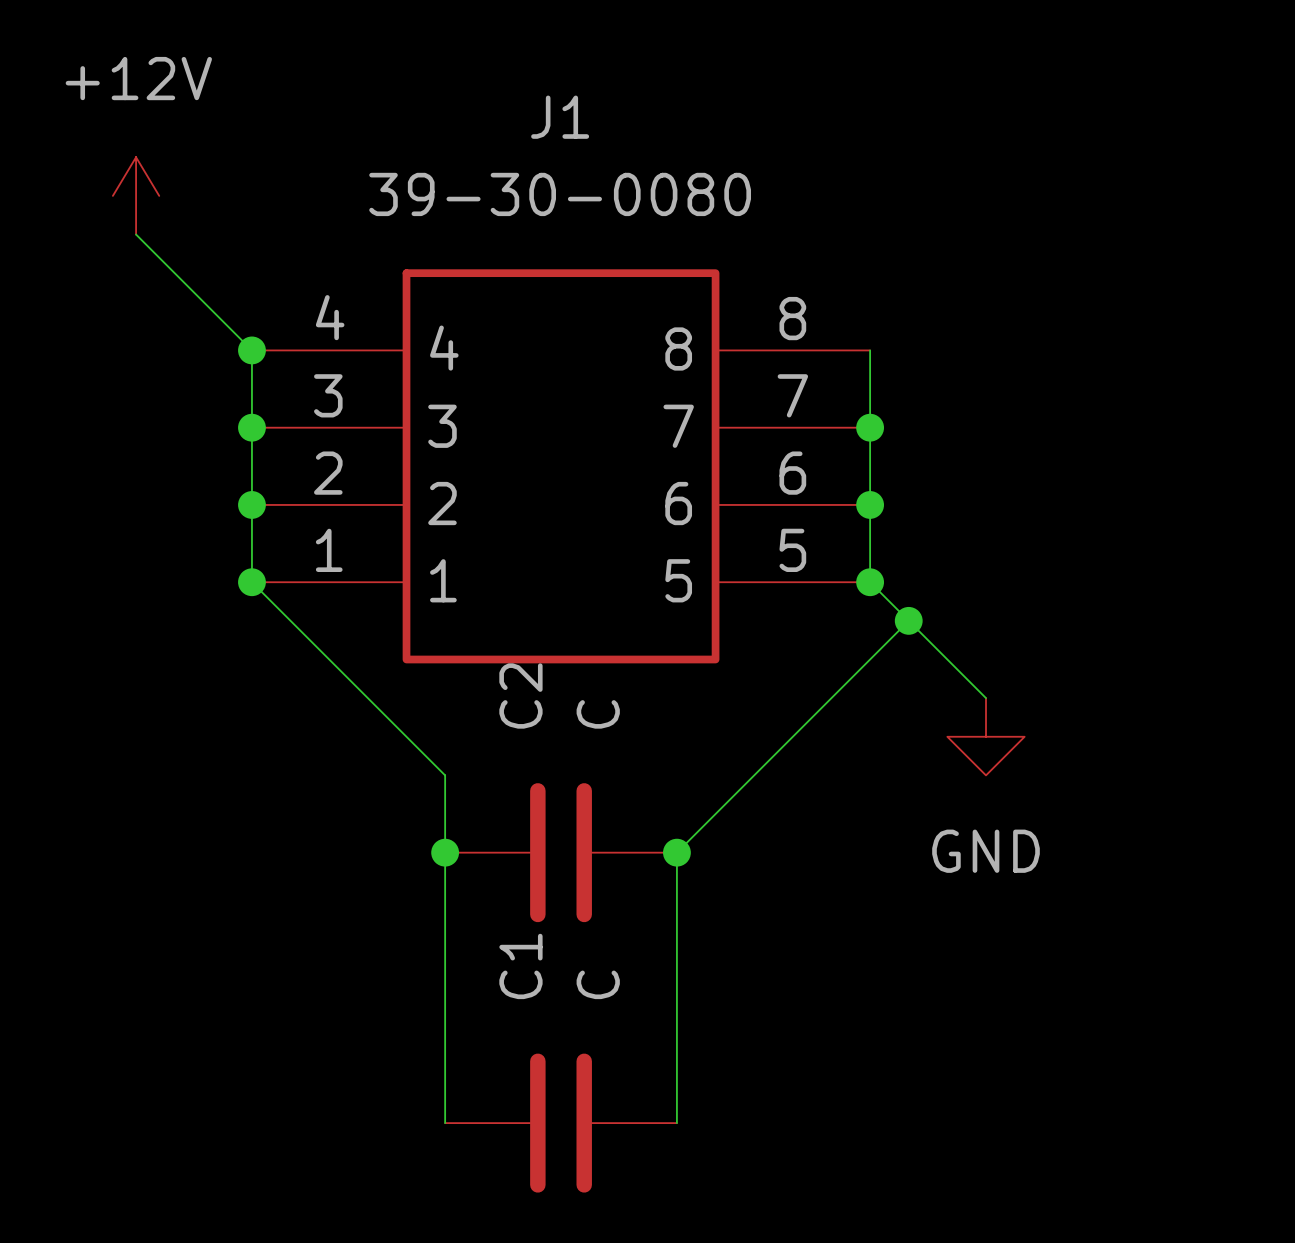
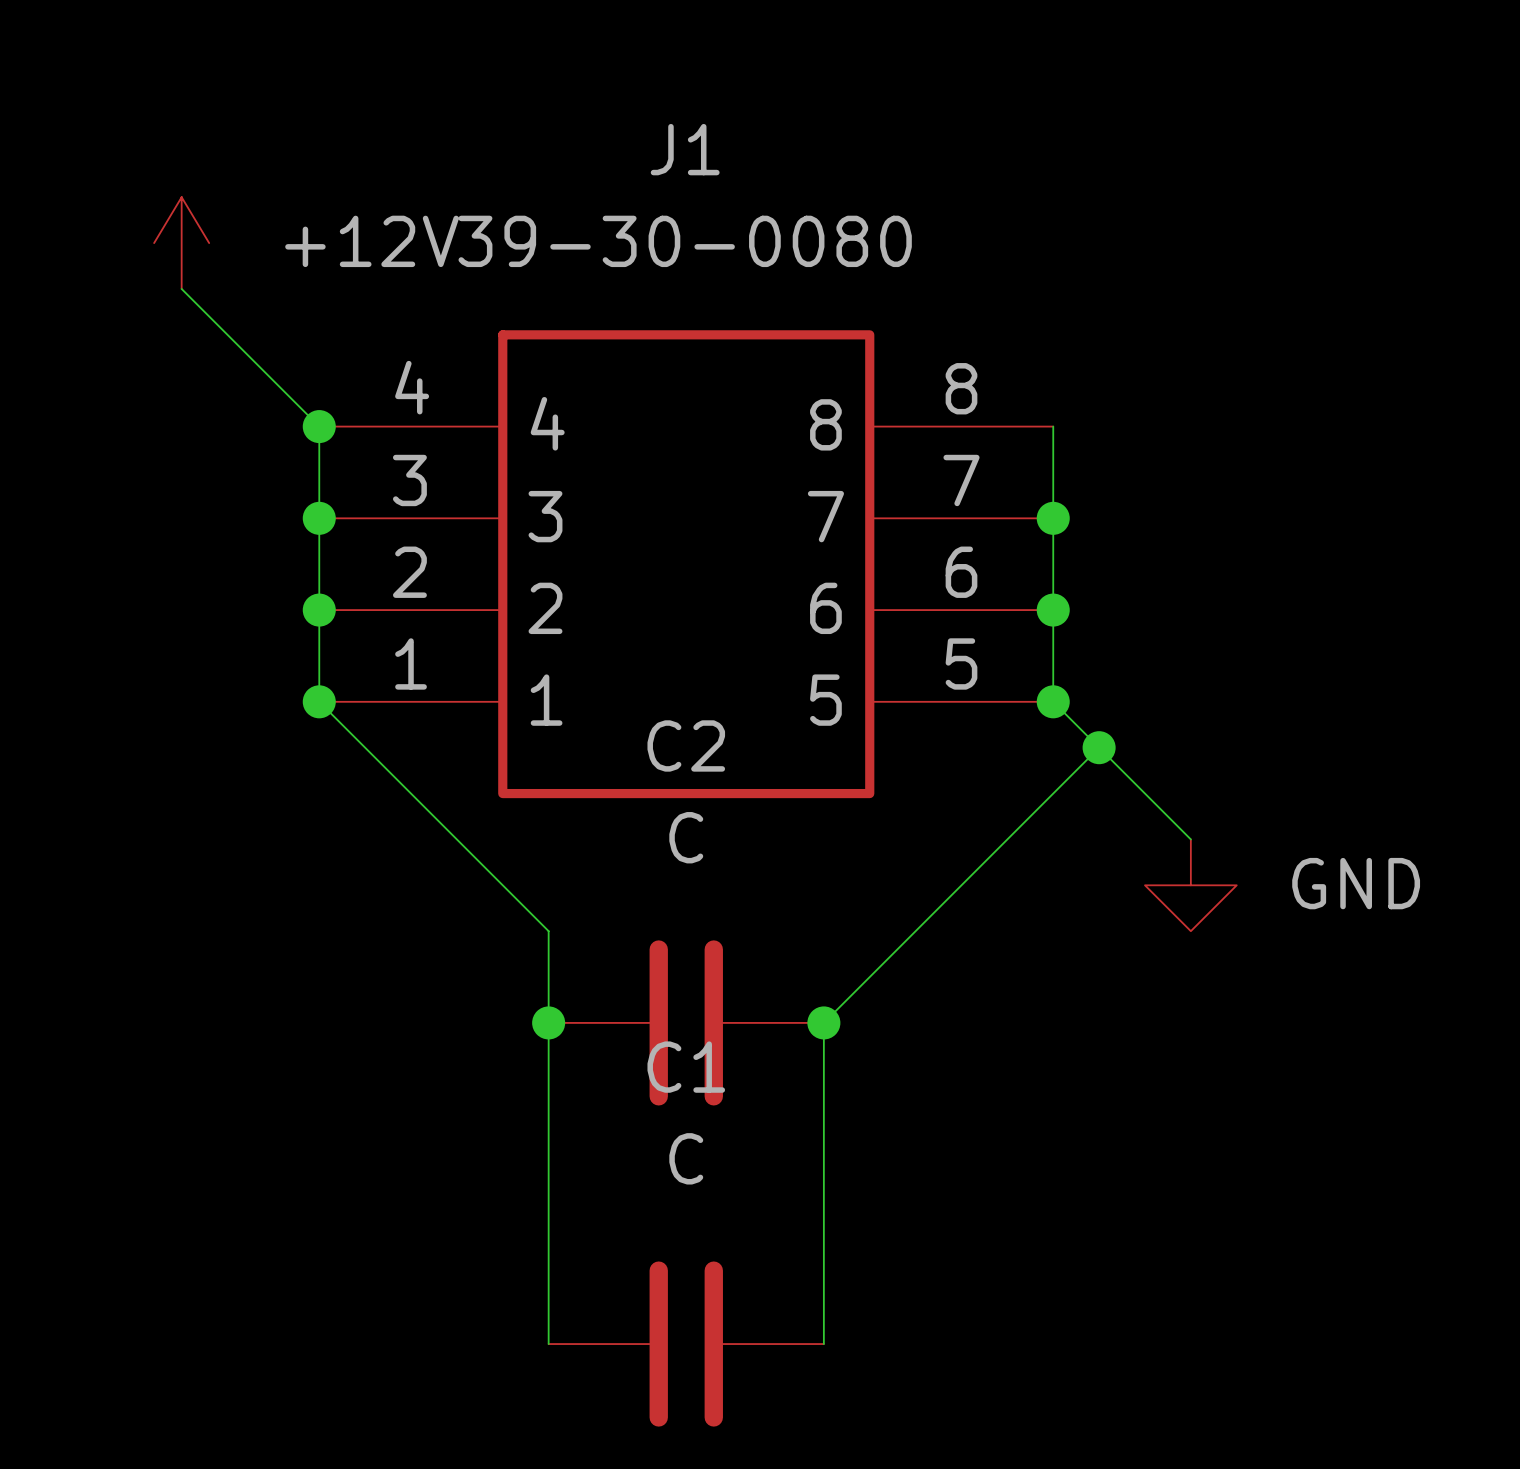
power symbol text position: +12V (138, 78) -> +12V (372, 241)
C2 name rotation: 0° (520, 696) -> 90° clockwise (686, 745)
C2 value rotation: 0° (598, 714) -> 90° clockwise (686, 837)
power symbol text position: GND (986, 851) -> GND (1356, 883)
C1 name rotation: 0° (520, 966) -> 90° clockwise (686, 1067)
C1 value rotation: 0° (598, 984) -> 90° clockwise (686, 1158)

